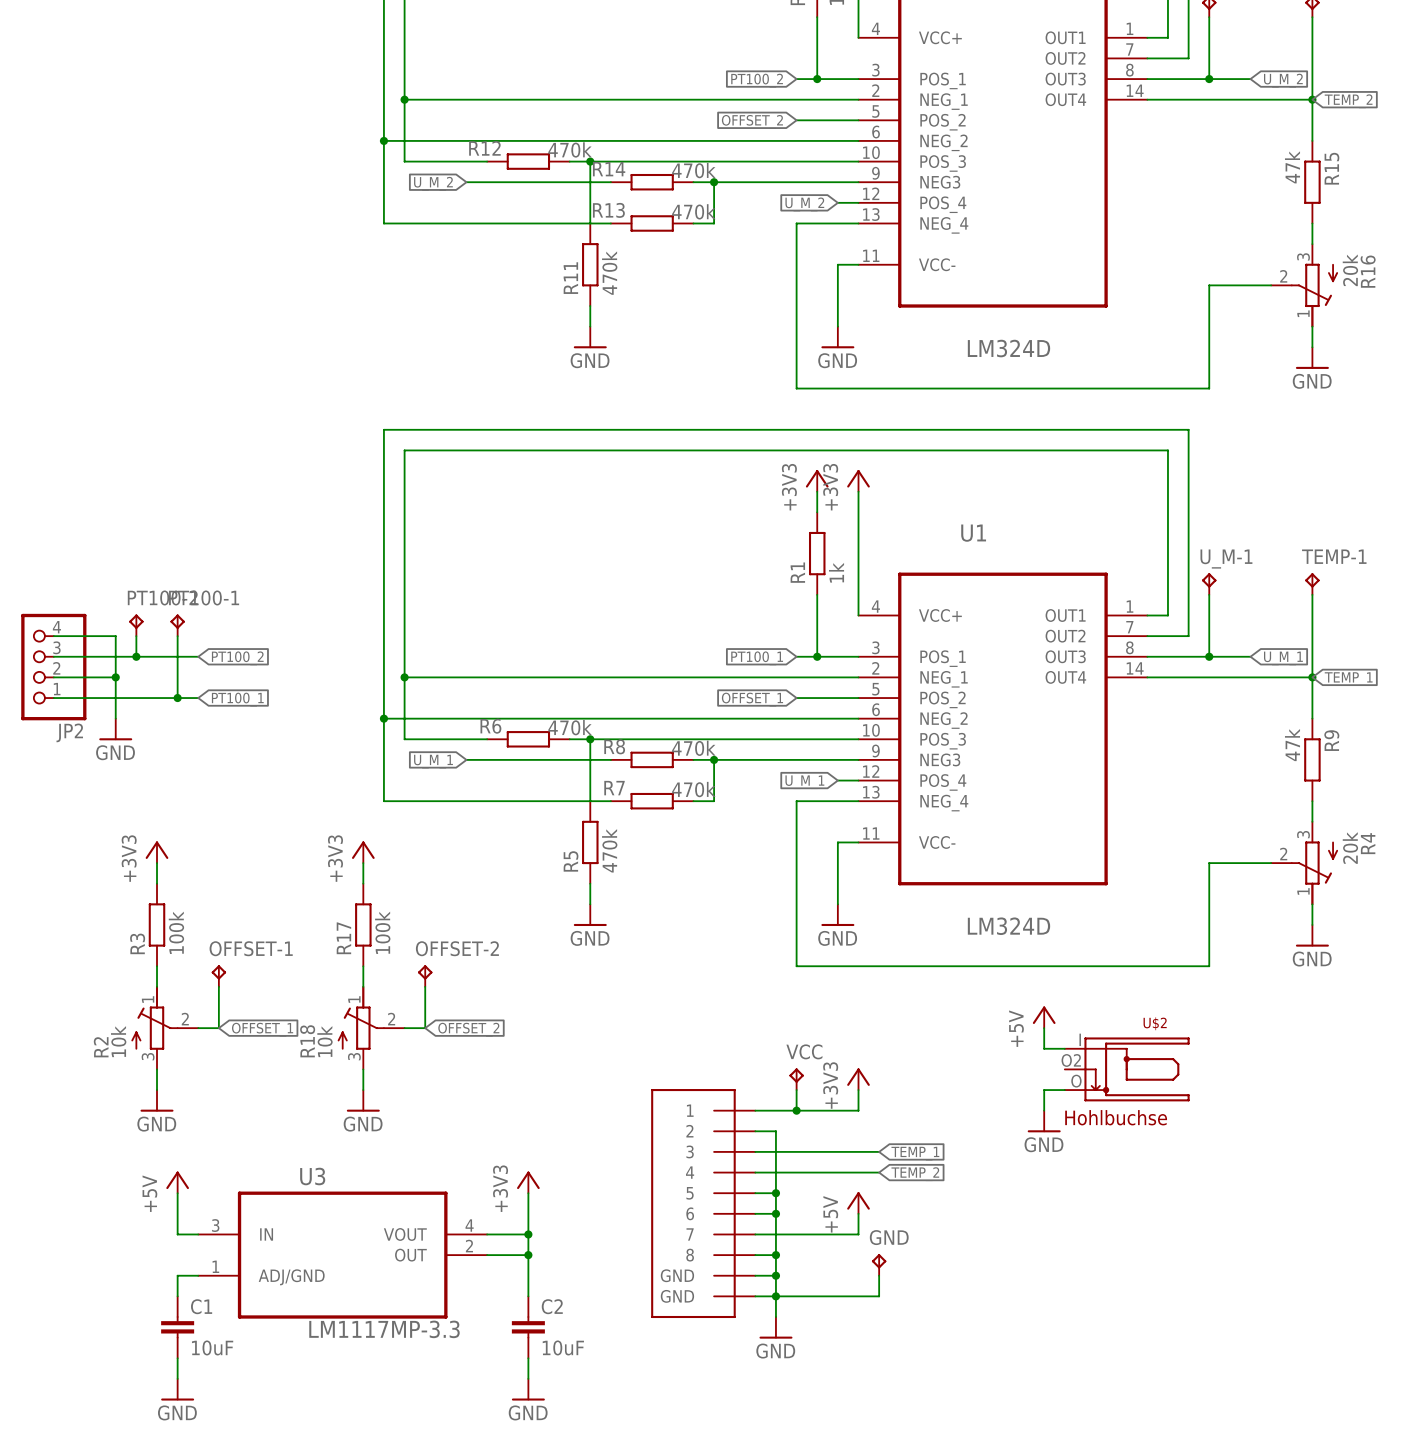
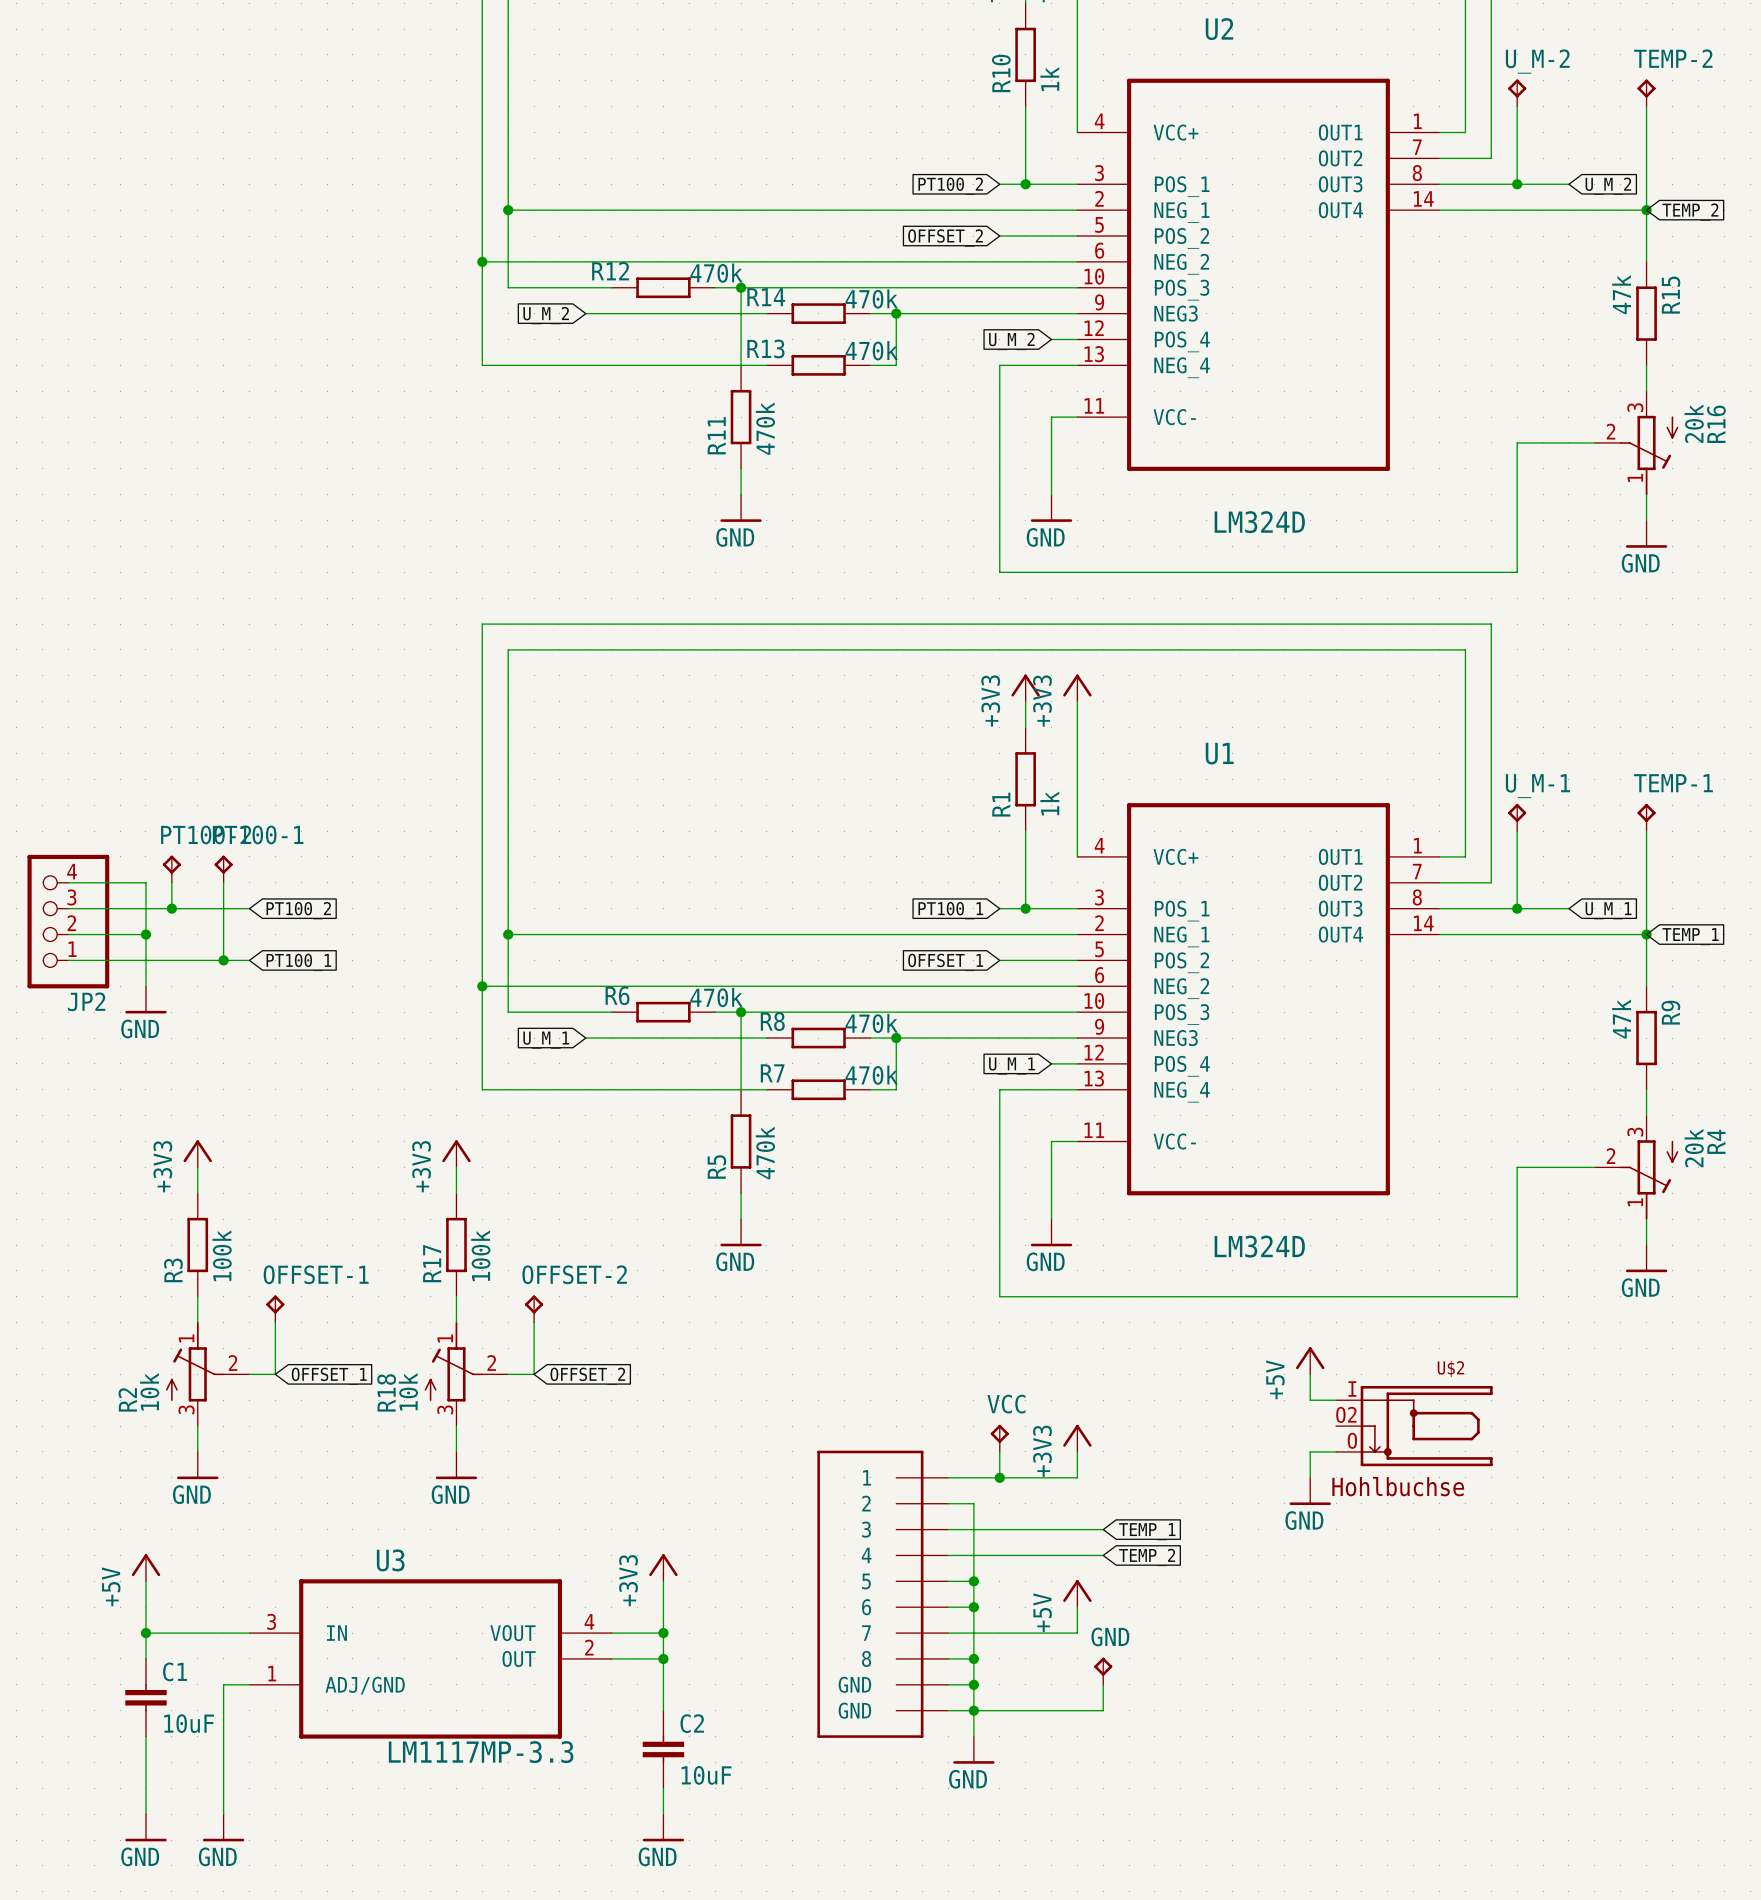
power symbol position: +5V (177, 1182) -> +5V (145, 1567)
wire: none -> (145, 1581) (145, 1658)
wire: (177, 1193) (177, 1234) -> (145, 1633) (223, 1633)
junction: none -> (145, 1633)
wire: none -> (145, 1736) (145, 1814)
C1 position: (177, 1327) -> (145, 1697)
power symbol: none -> GND (145, 1827)

